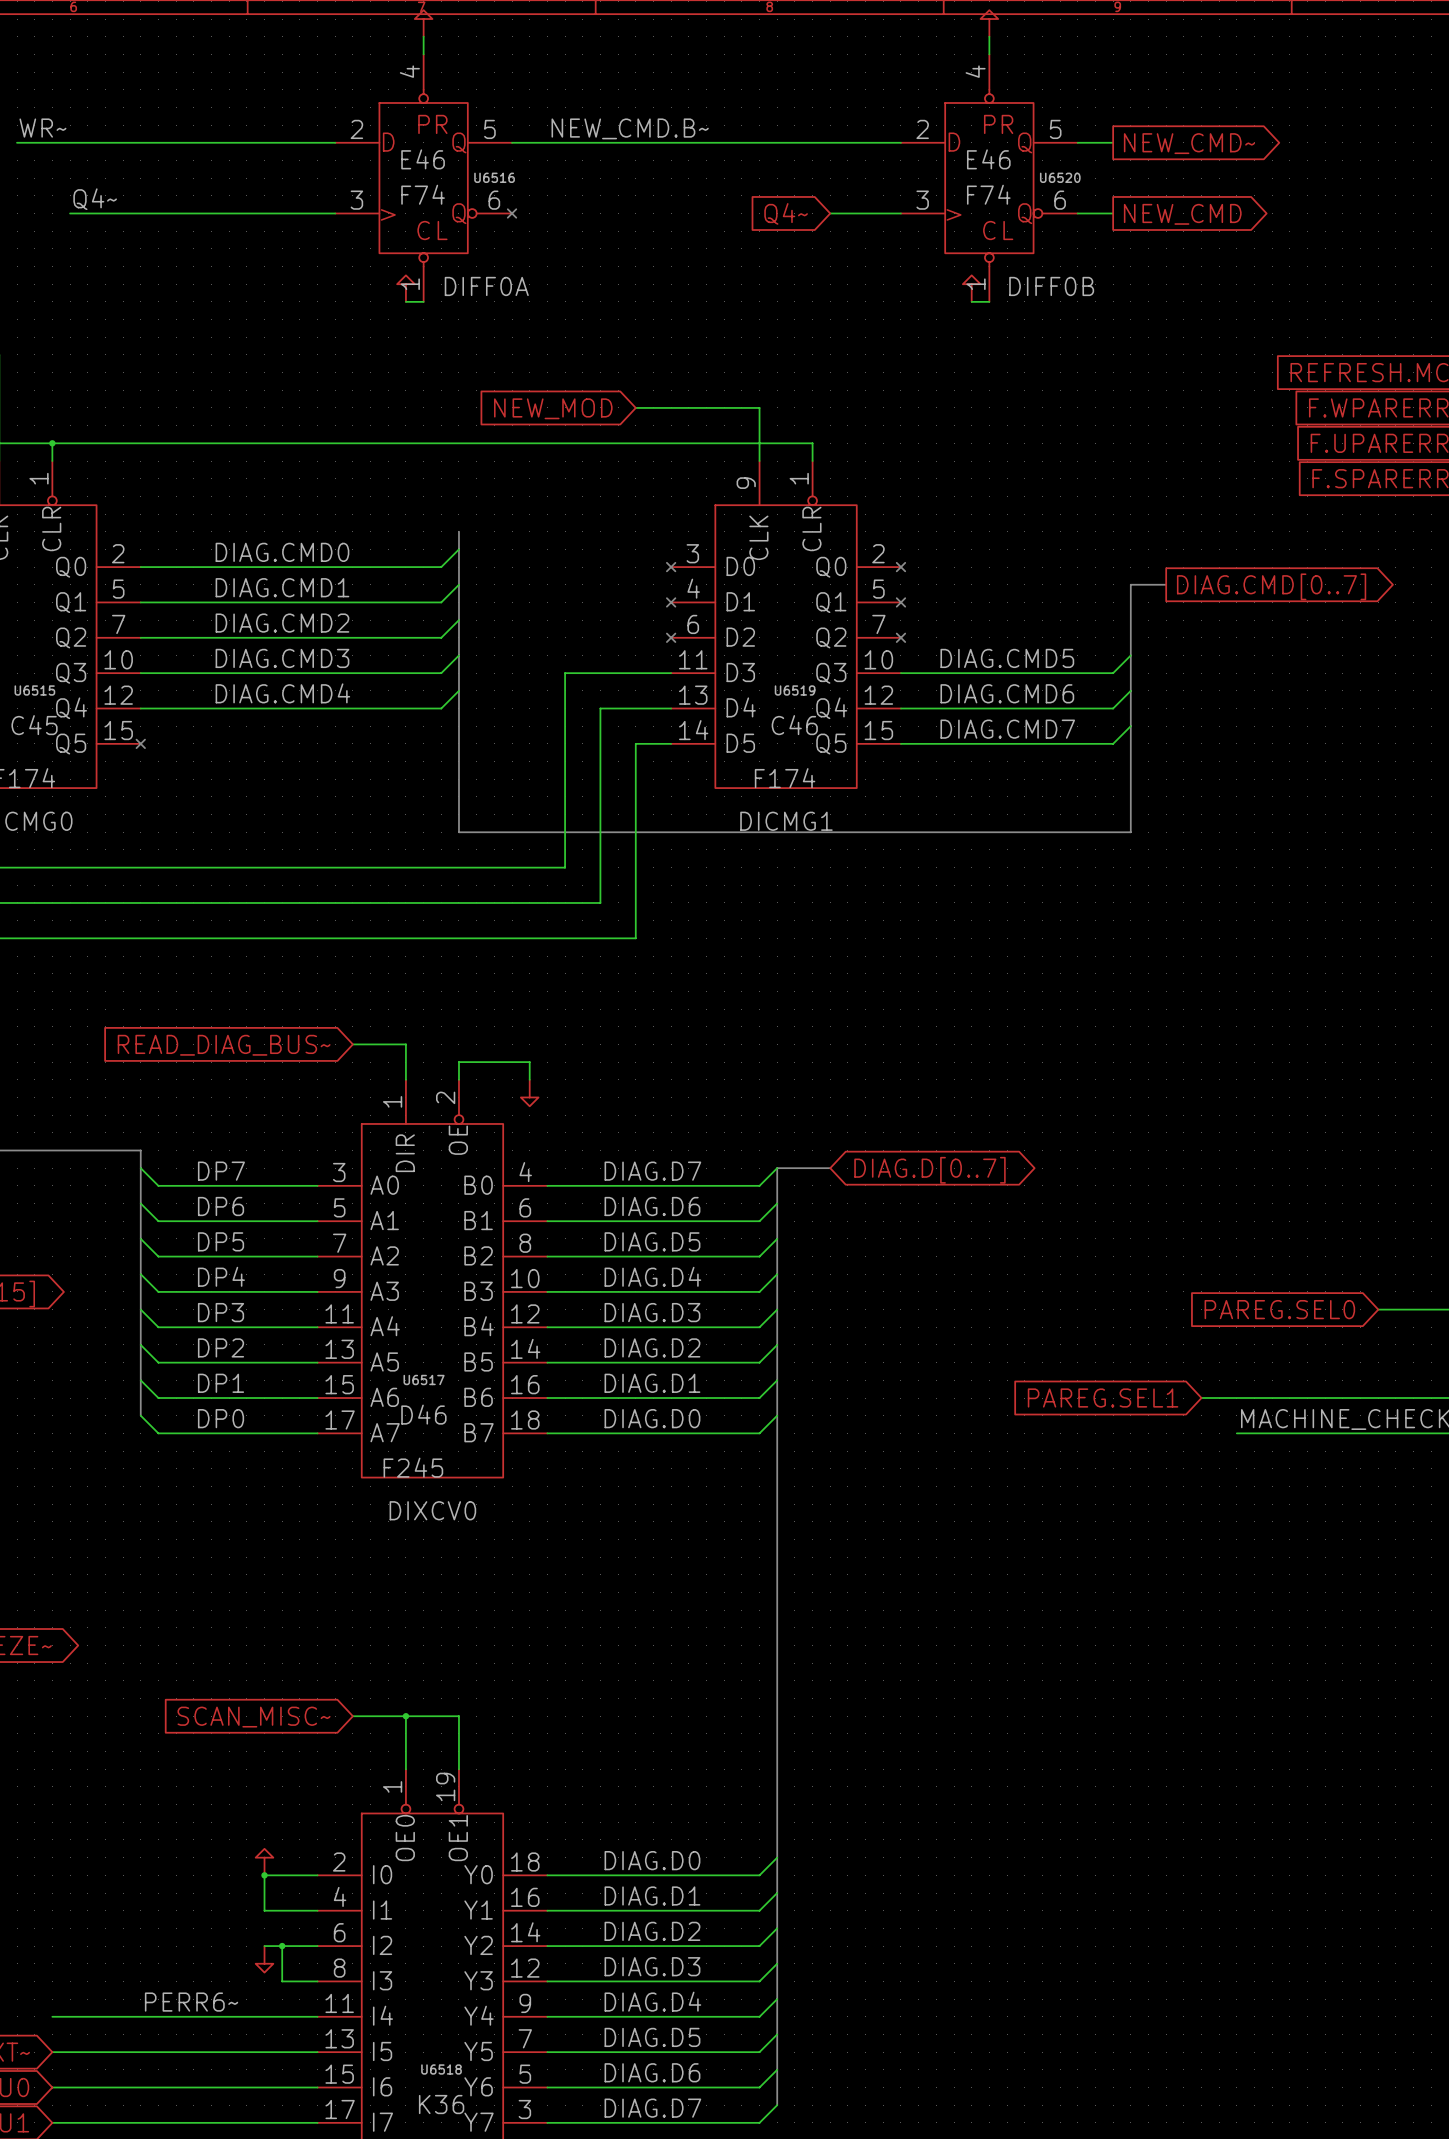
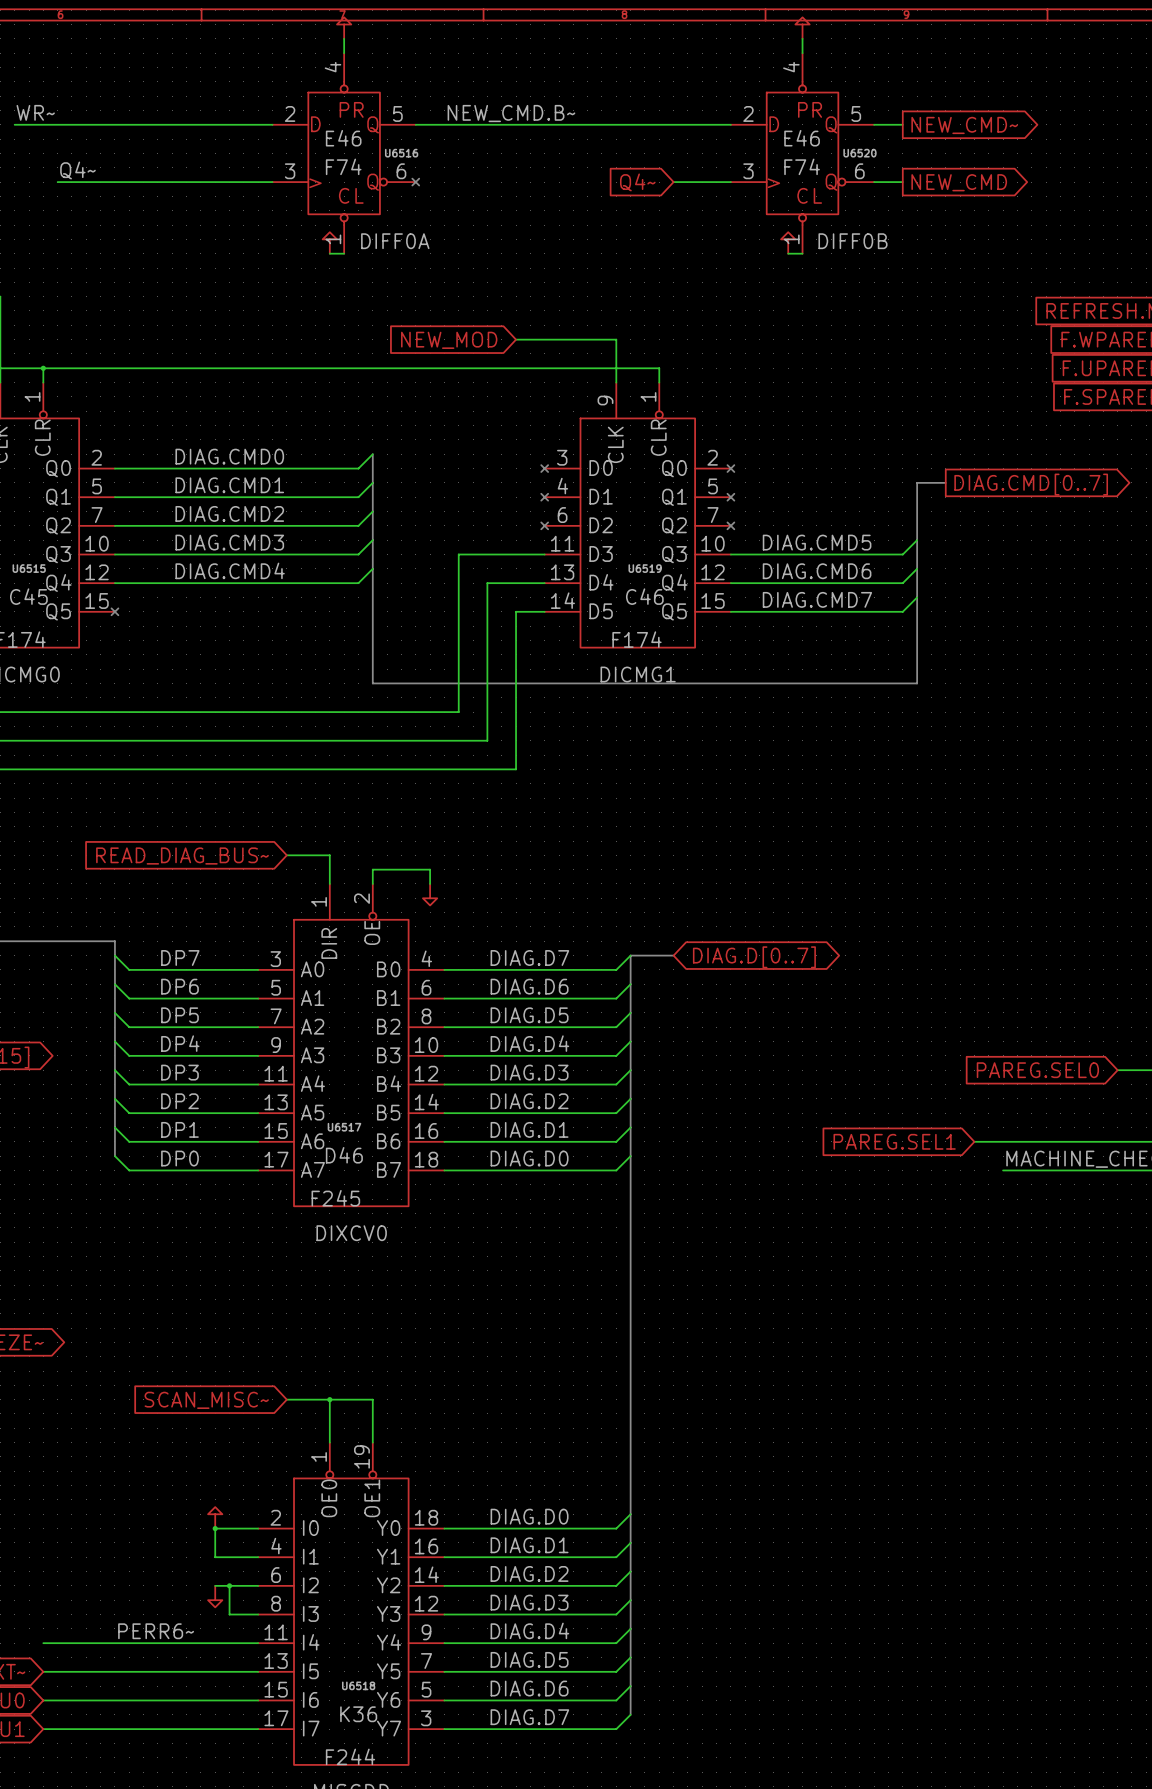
bus: (458, 531) (458, 549) -> none

